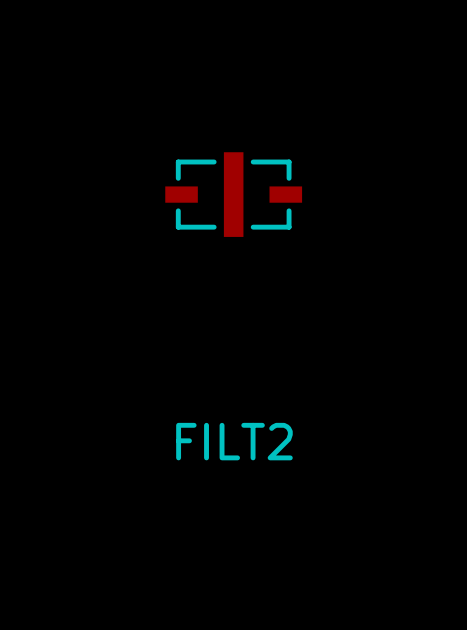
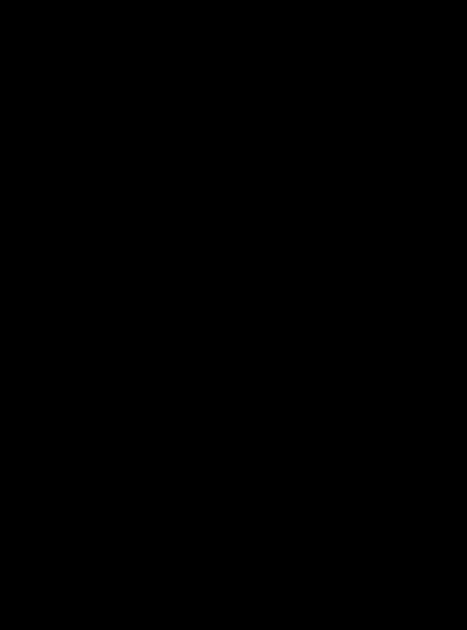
FILT2: (233, 194) -> none

